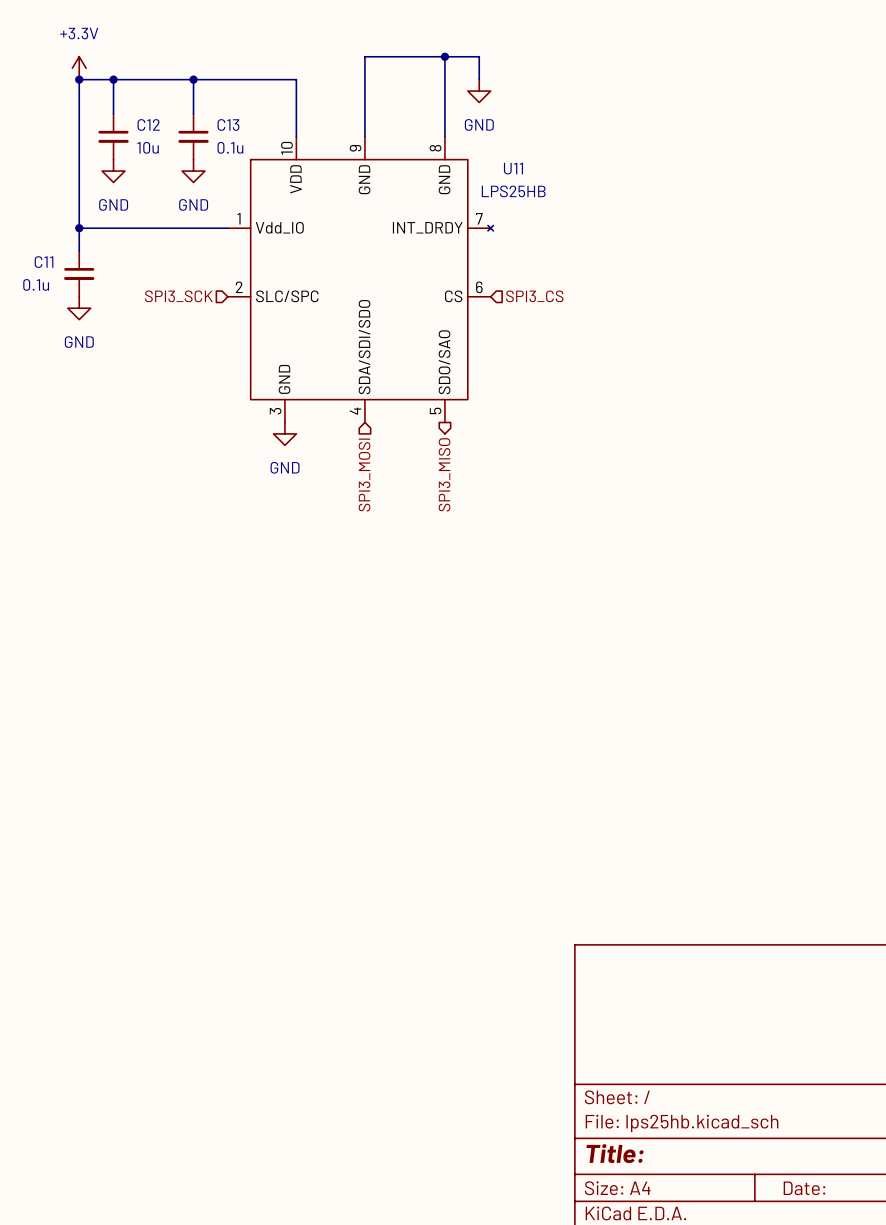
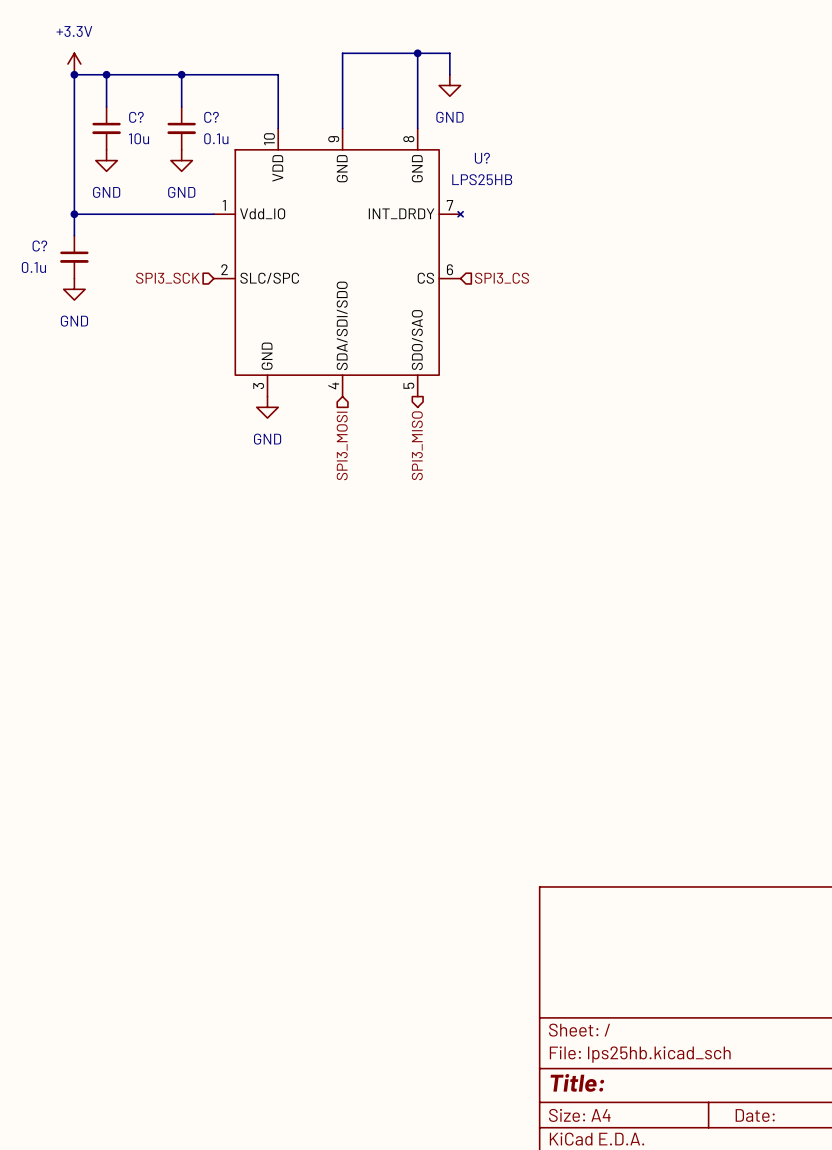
C12 name: C12 (148, 124) -> C? (136, 117)
C13 name: C13 (228, 124) -> C? (211, 117)
U11 name: U11 (513, 168) -> U? (482, 158)
C11 name: C11 (44, 262) -> C? (39, 246)

